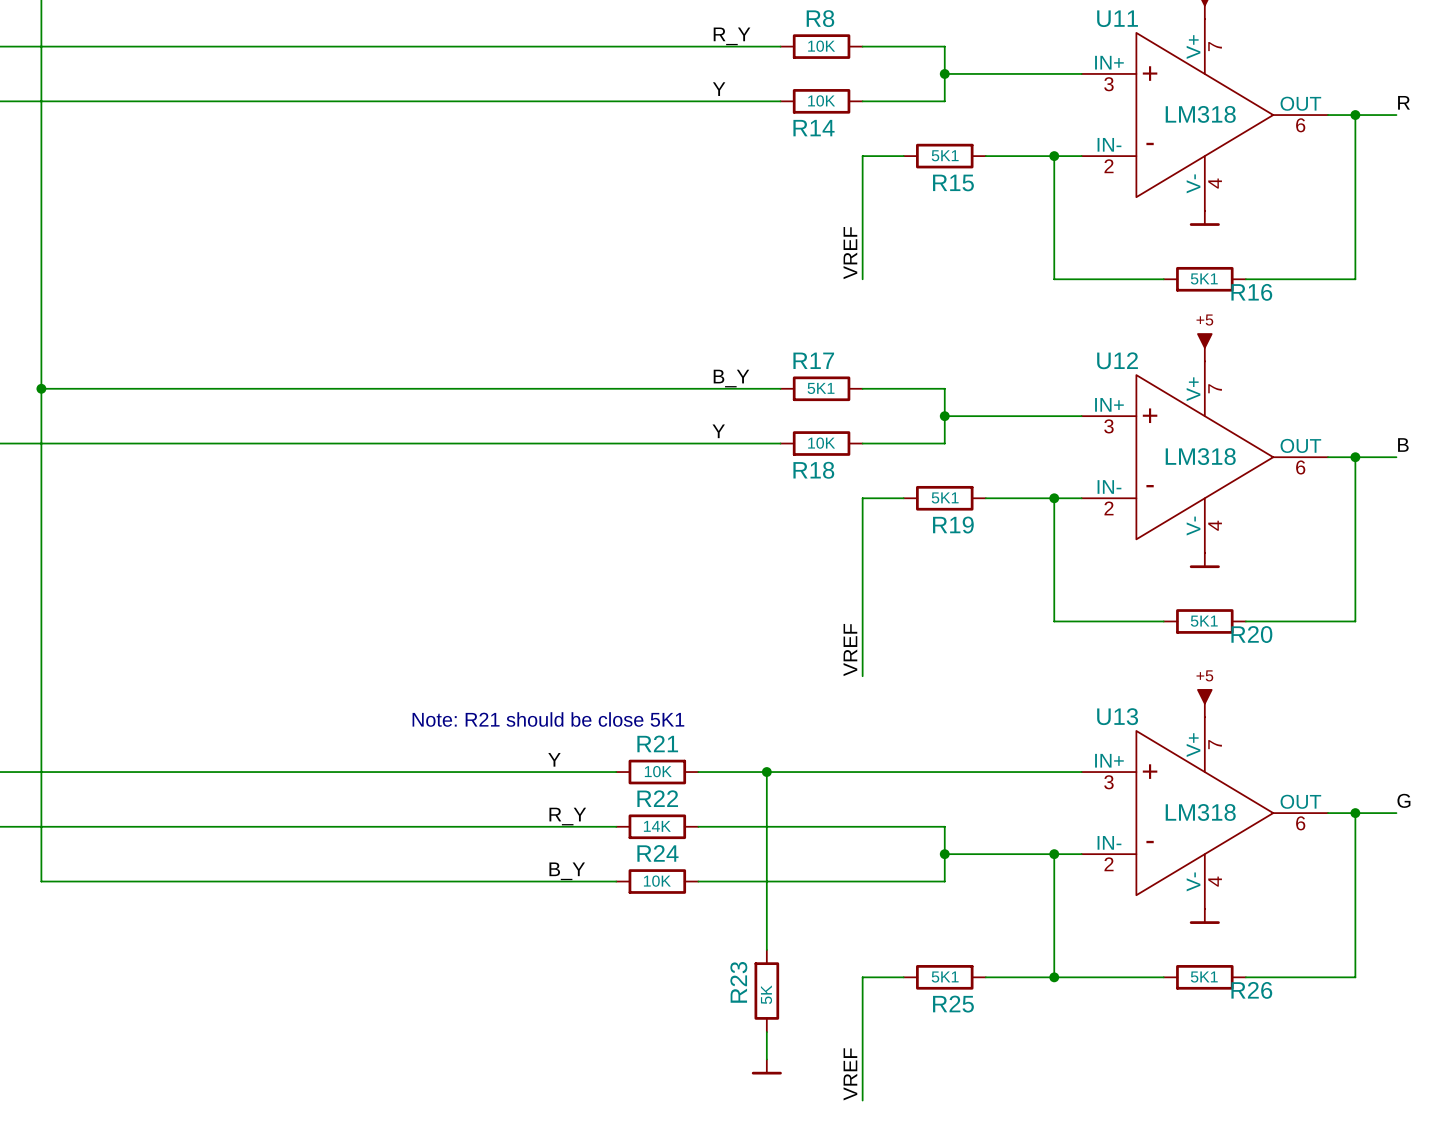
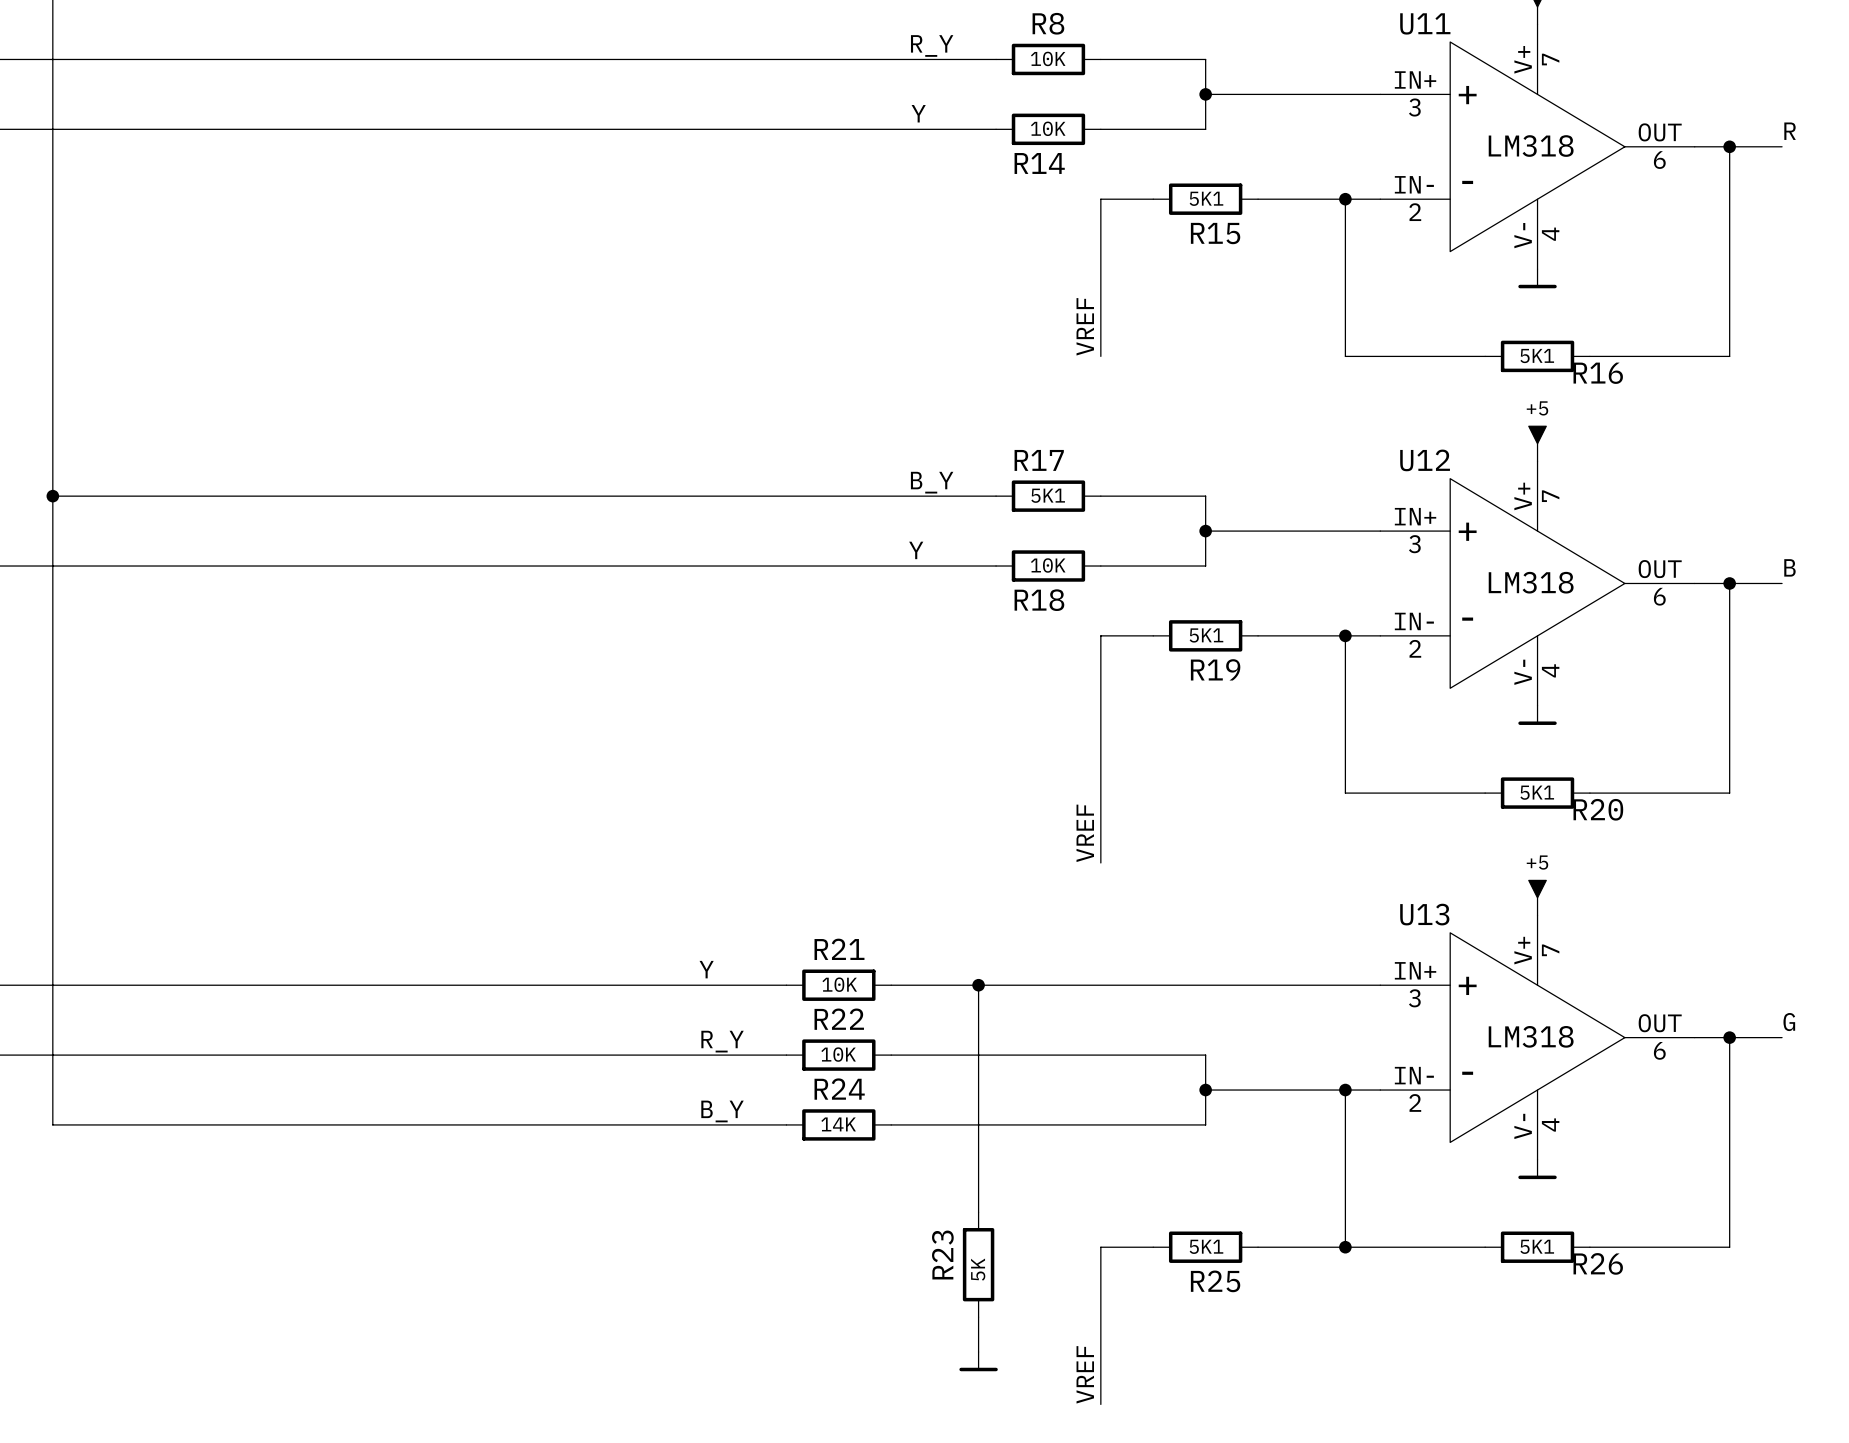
text: Note: R21 should be close 5K1 (548, 719) -> none
R22 value: 14K (657, 826) -> 10K (838, 1054)
R24 value: 10K (657, 881) -> 14K (838, 1124)

